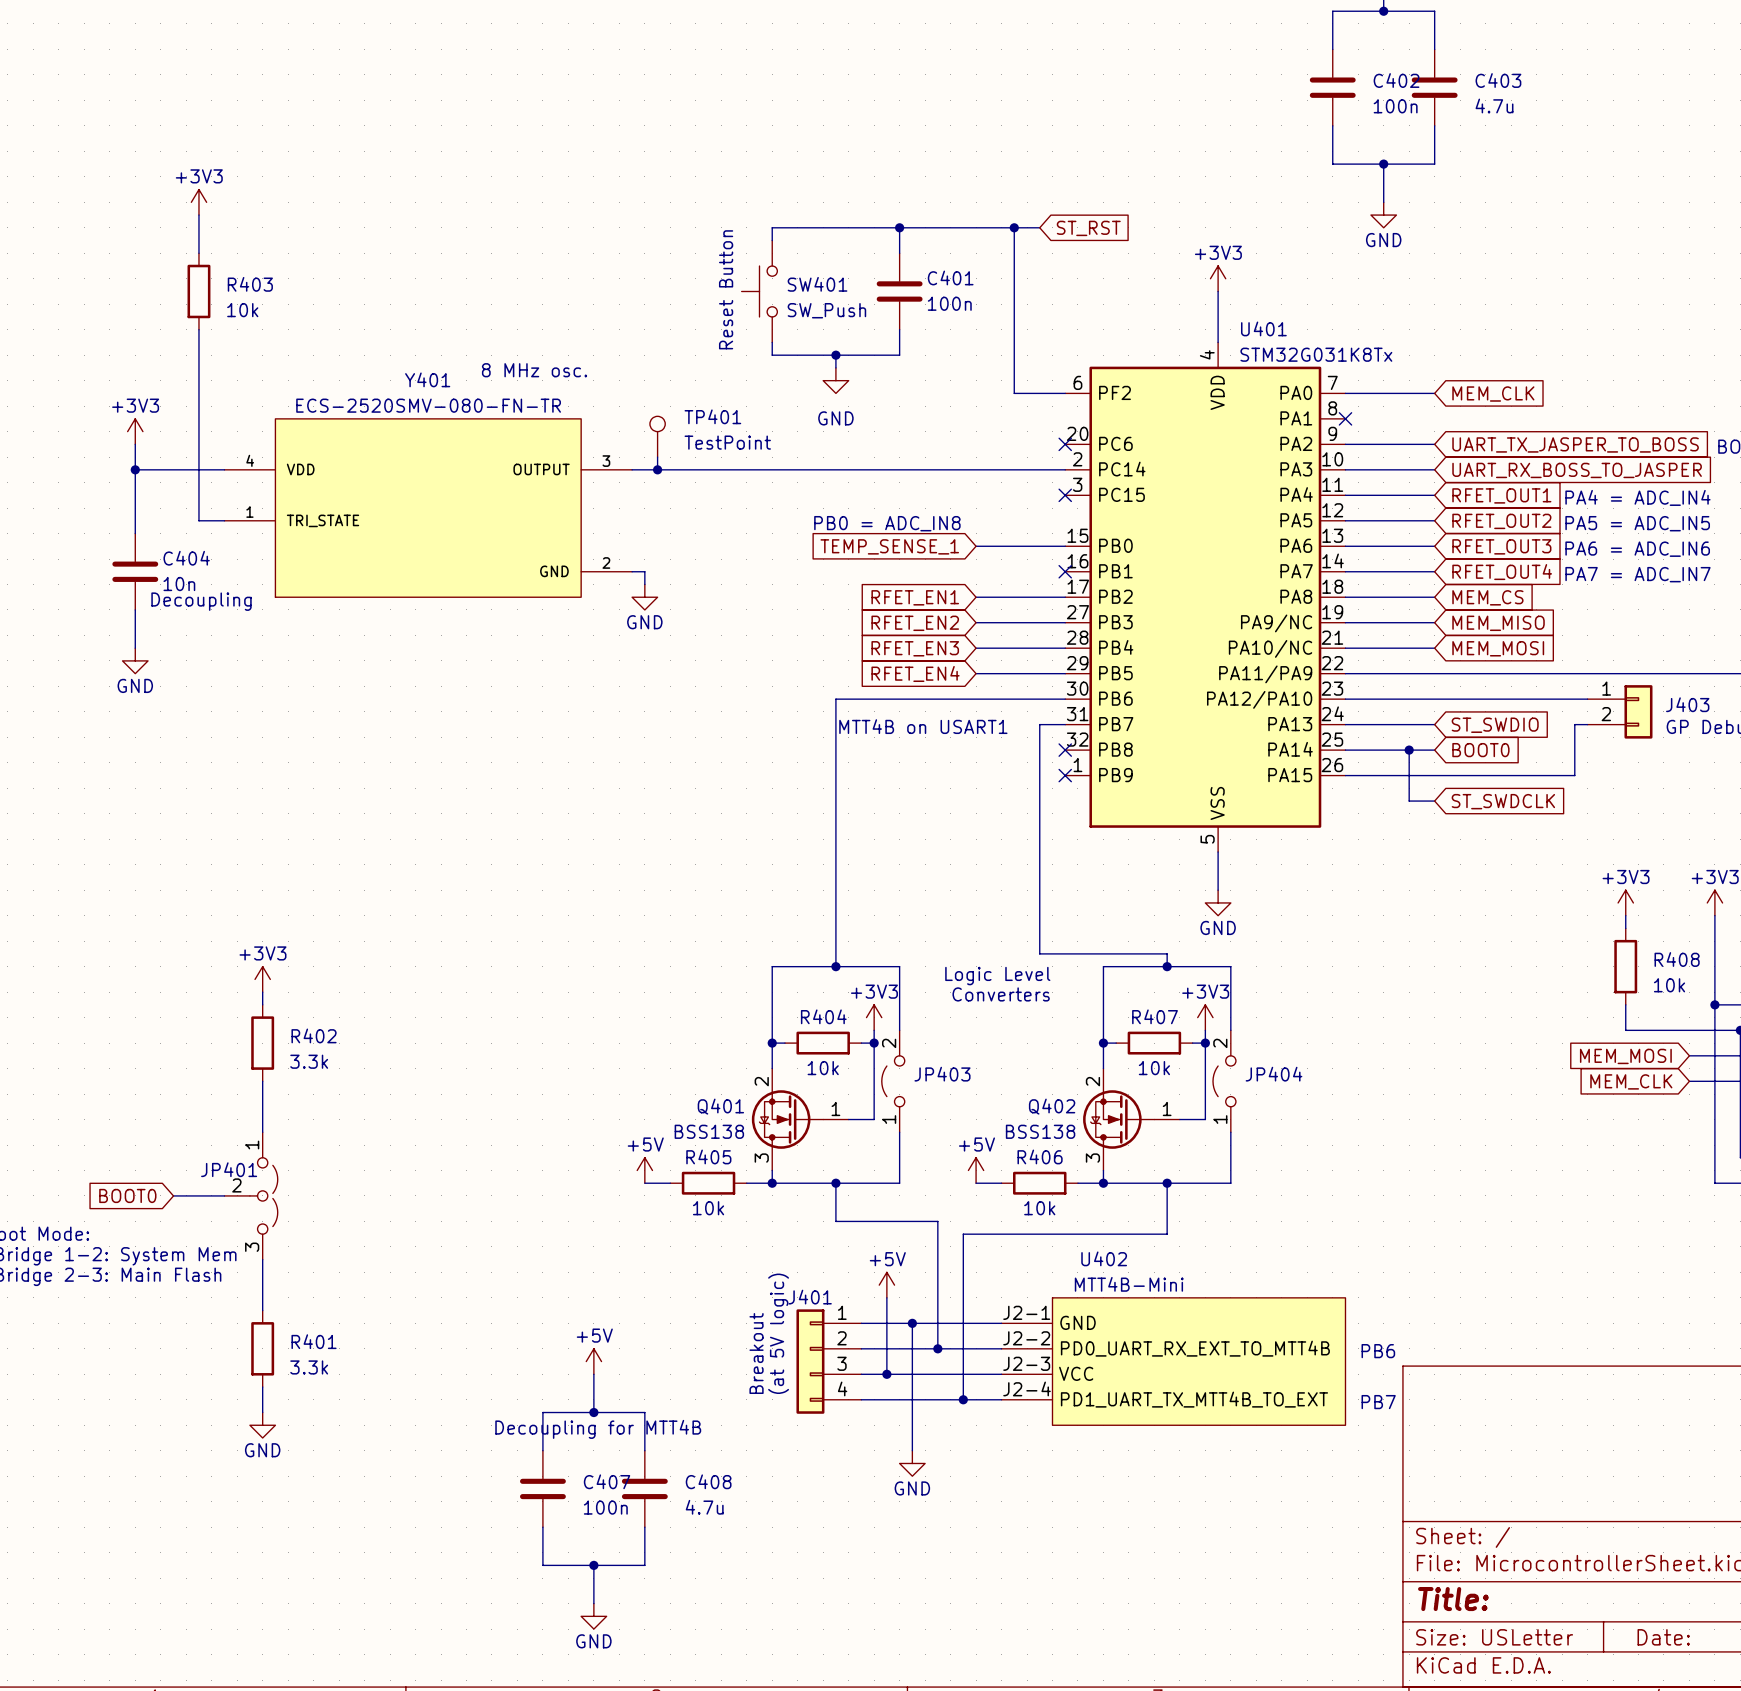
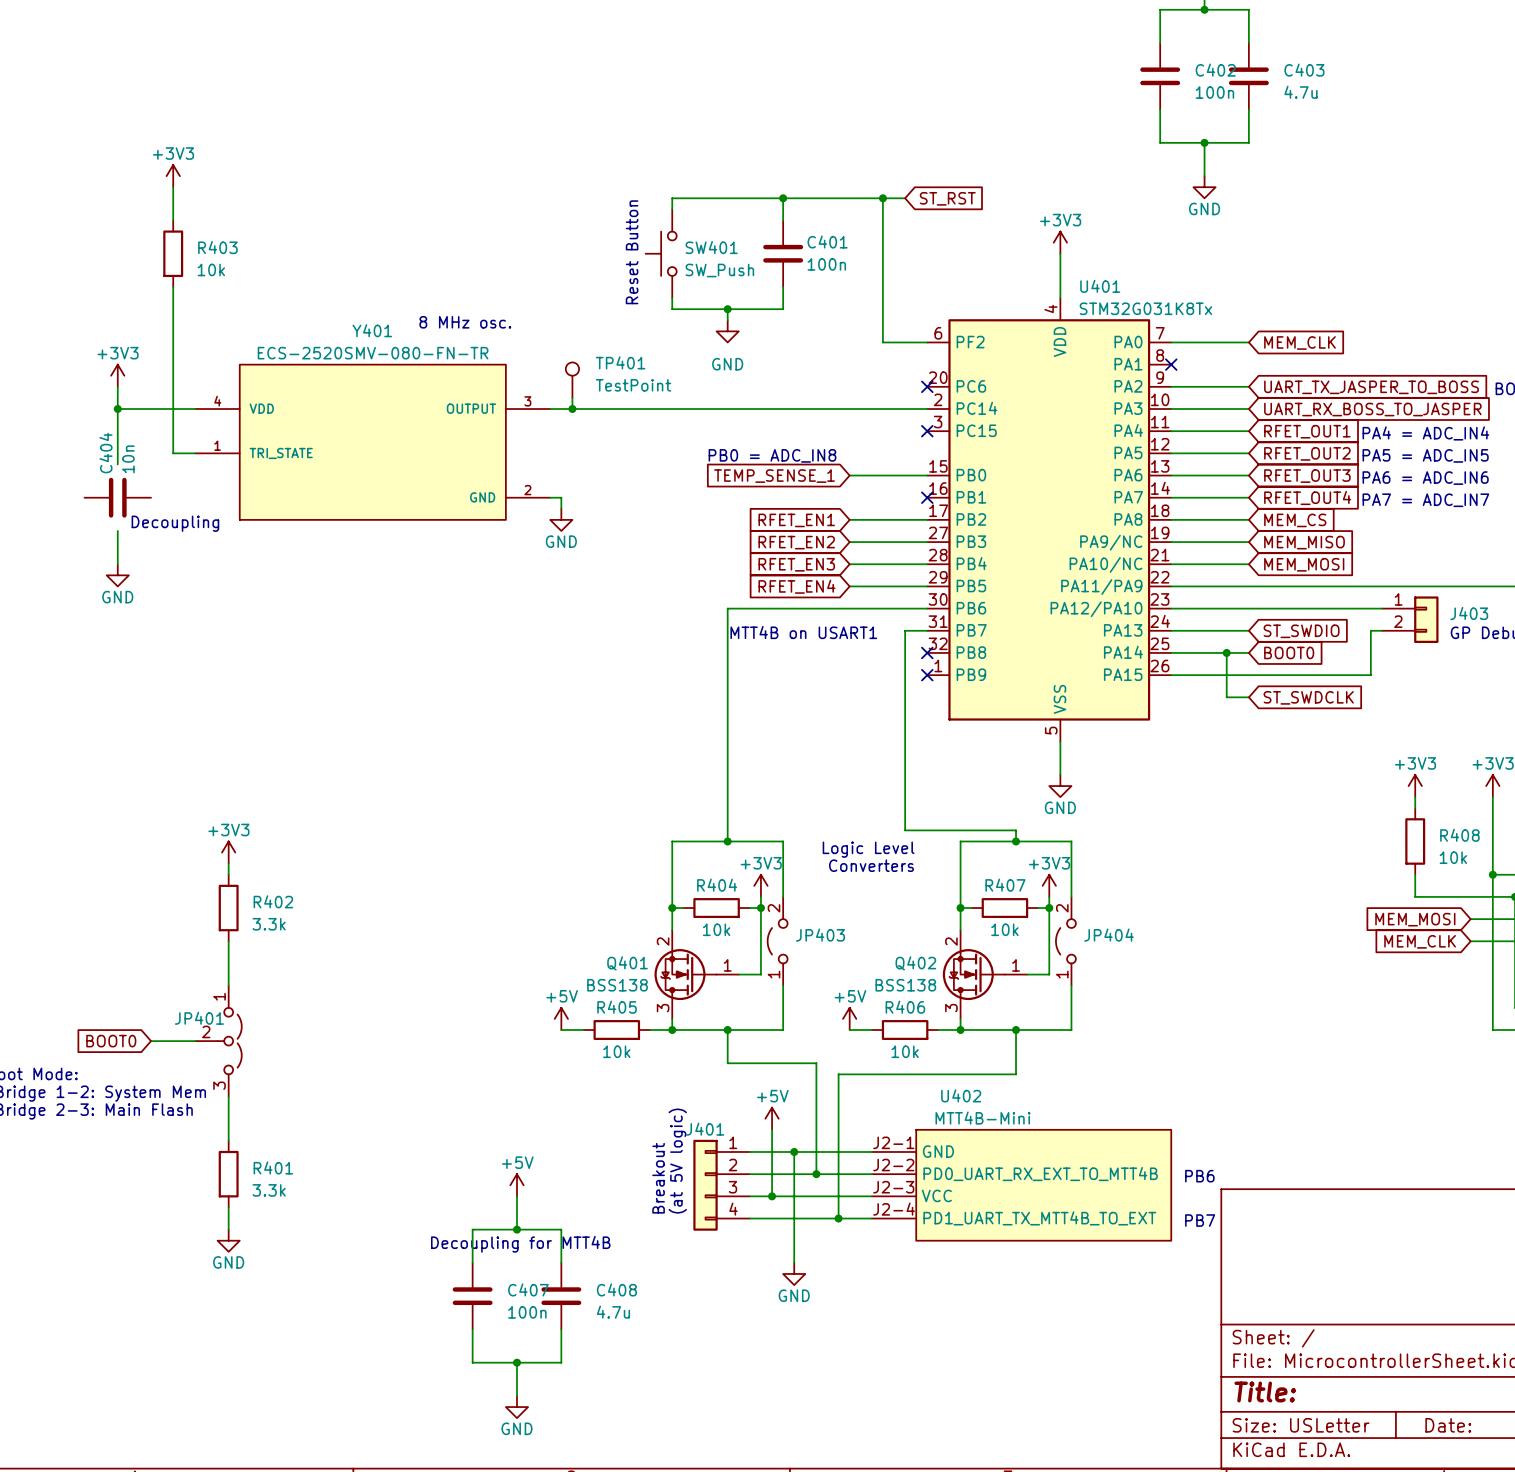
C404 name position: C404 (186, 558) -> C404 (106, 453)
C404 rotation: 0° (135, 571) -> 90° clockwise (117, 497)
C404 value position: 10n (179, 584) -> 10n (128, 459)

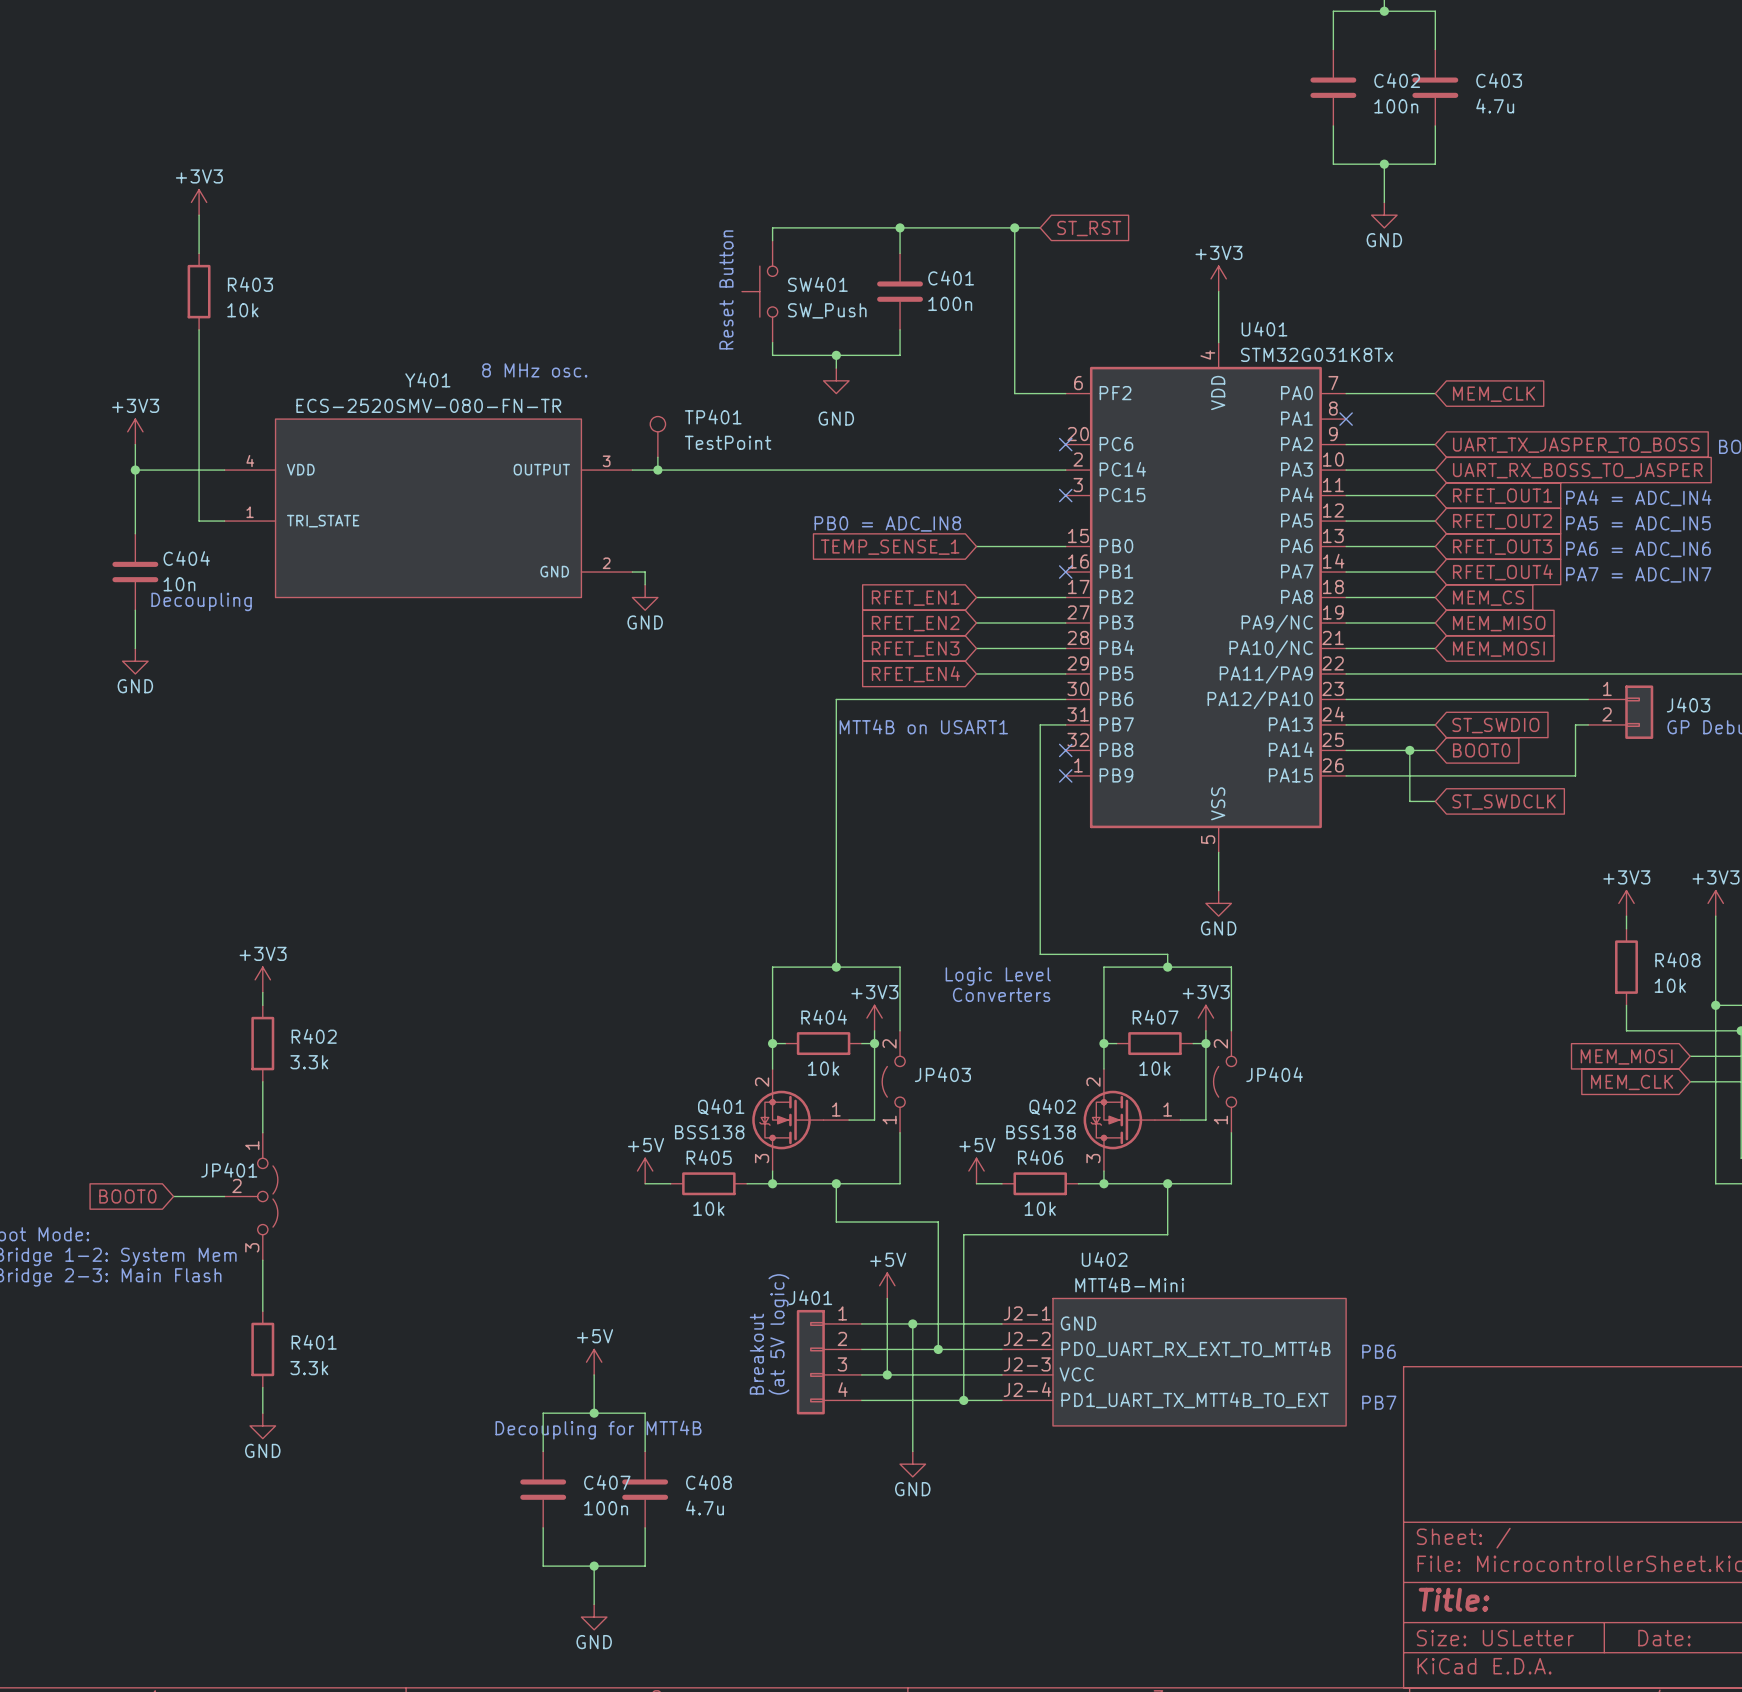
C404 rotation: 0° (117, 497) -> 90° clockwise (135, 572)

